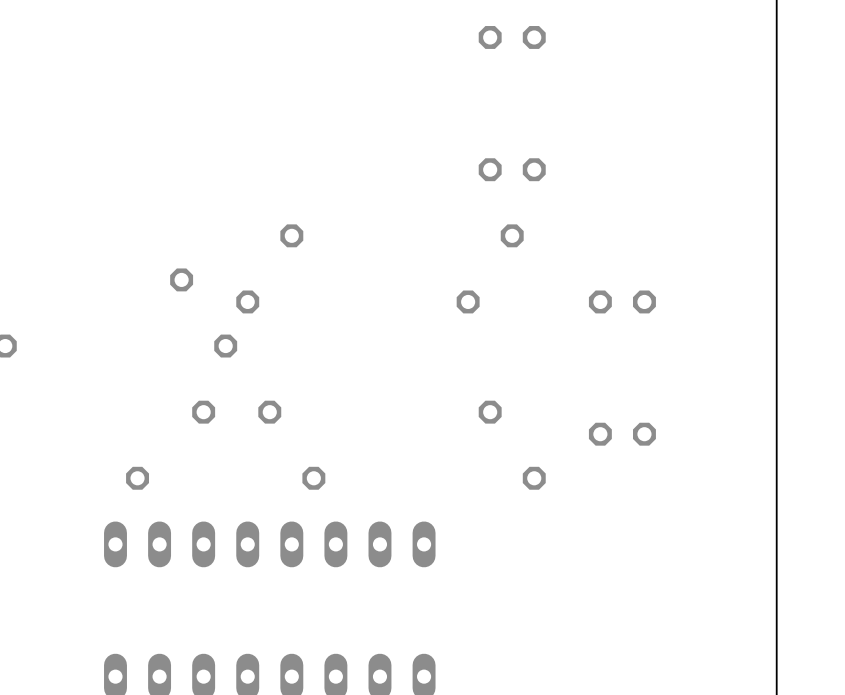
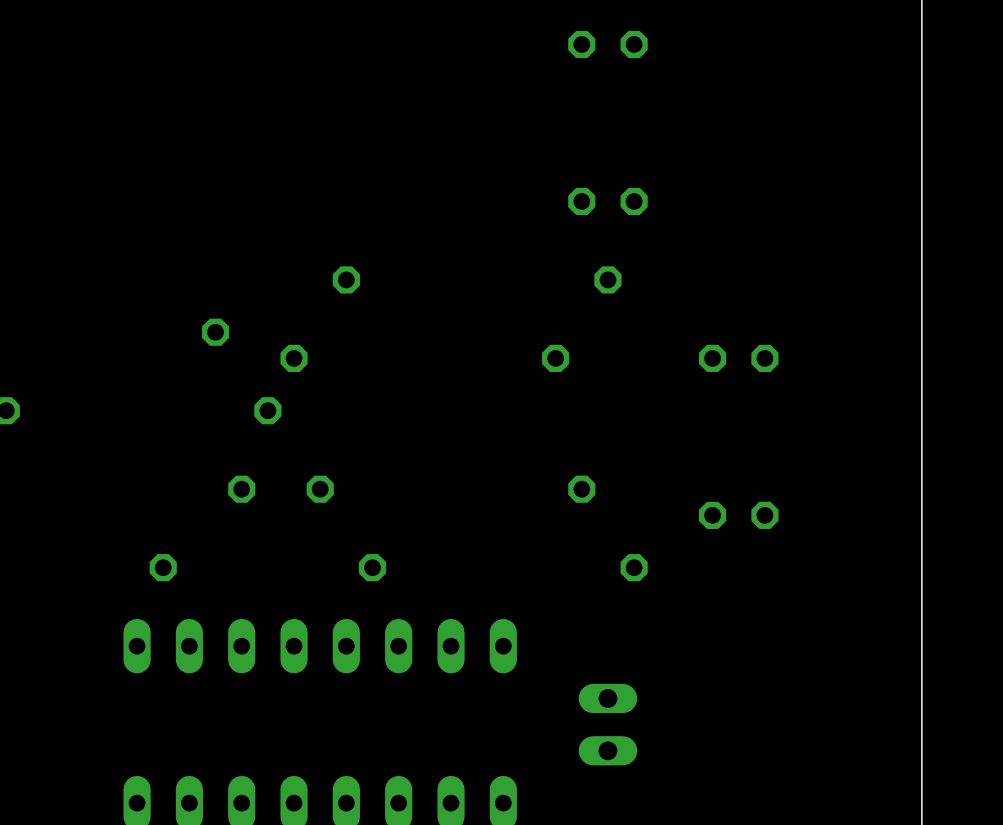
part: none -> (607, 724)

